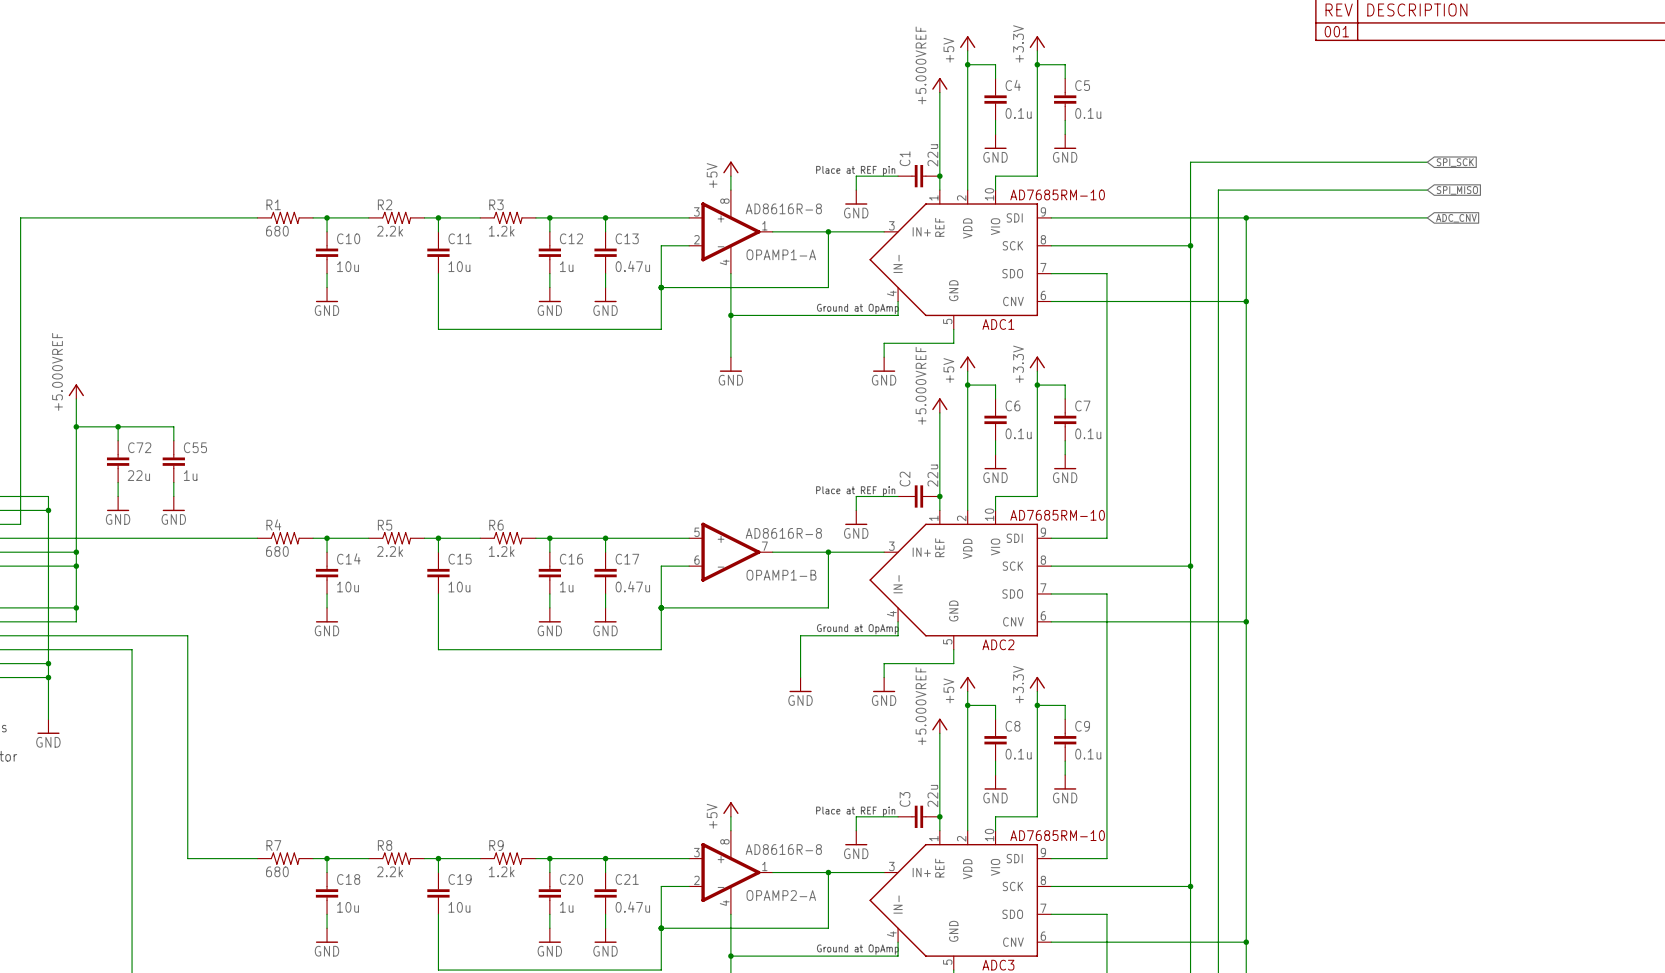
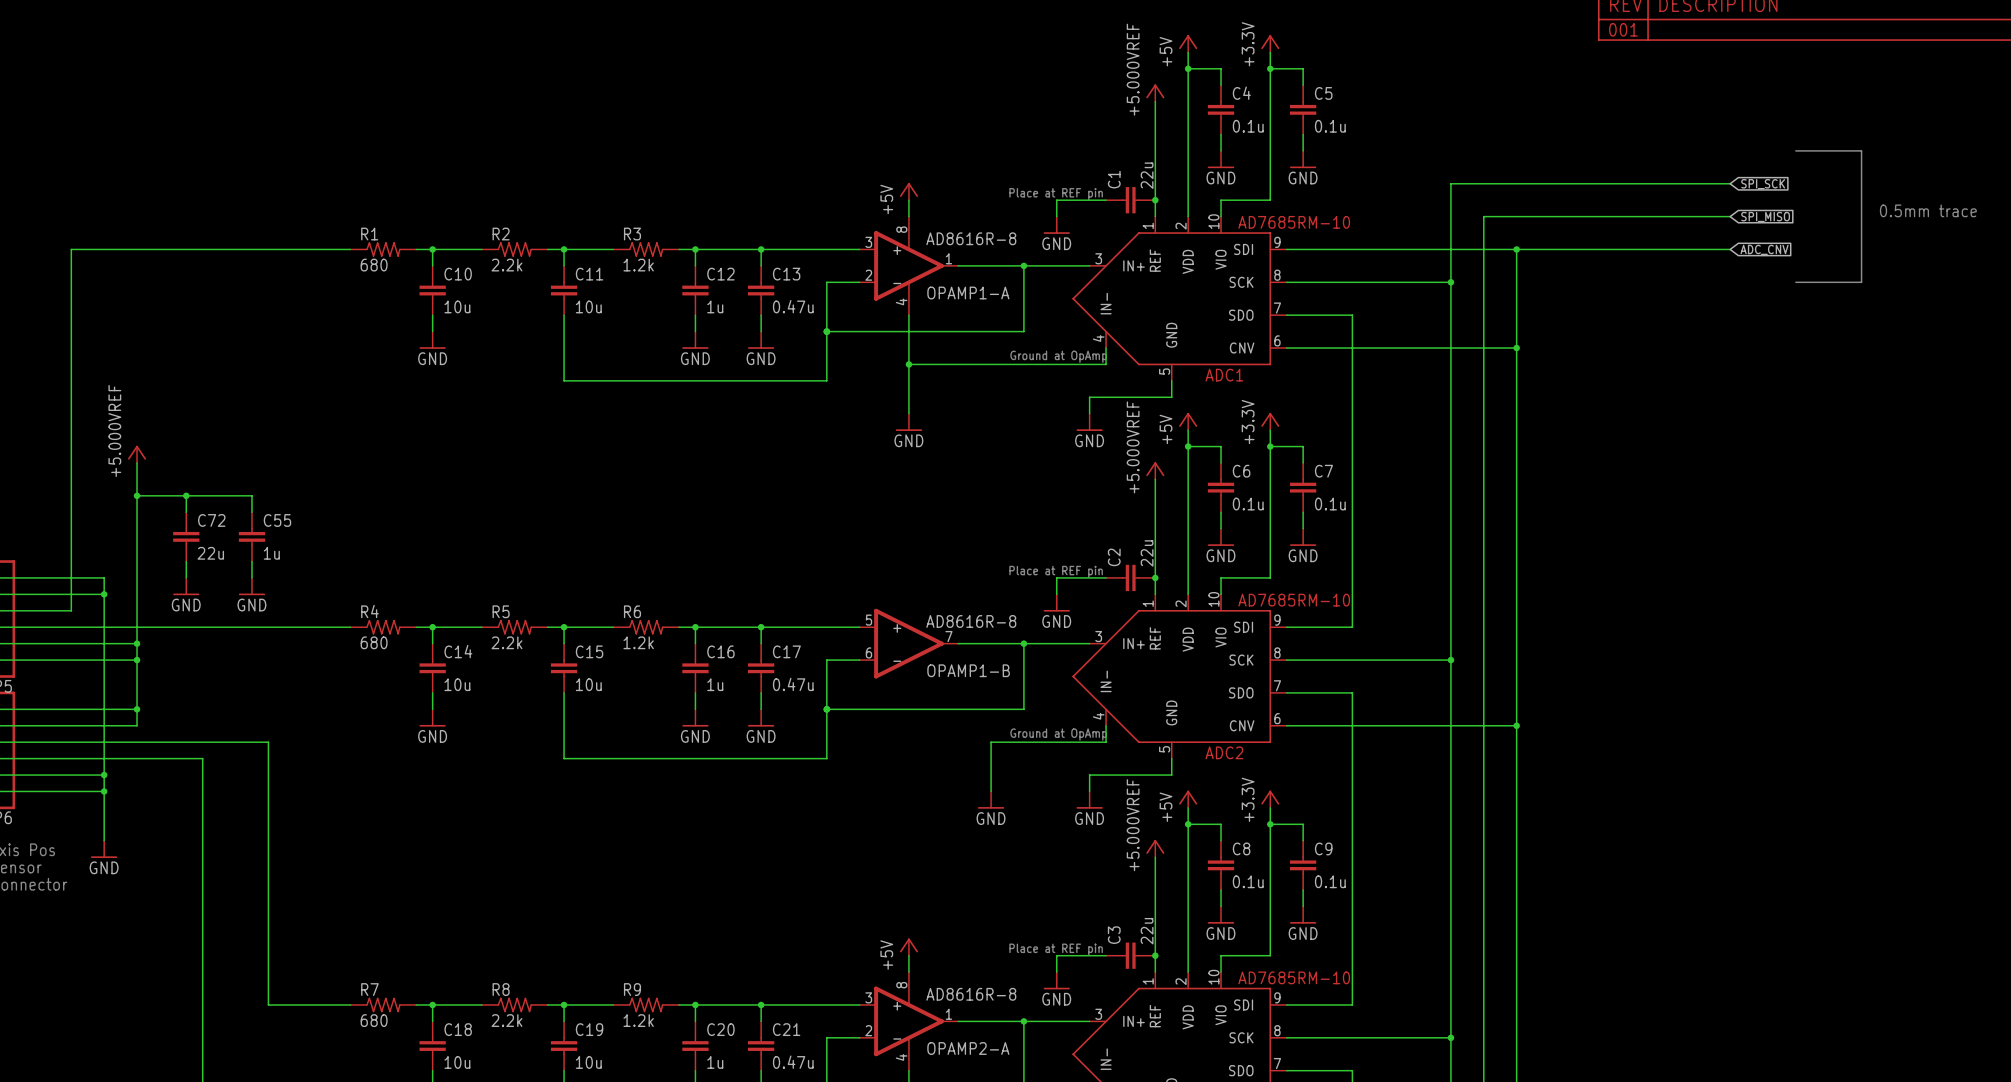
line: none -> (1795, 150) (1861, 150) (1861, 282) (1795, 282)
text: none -> 0.5mm trace (1928, 210)

